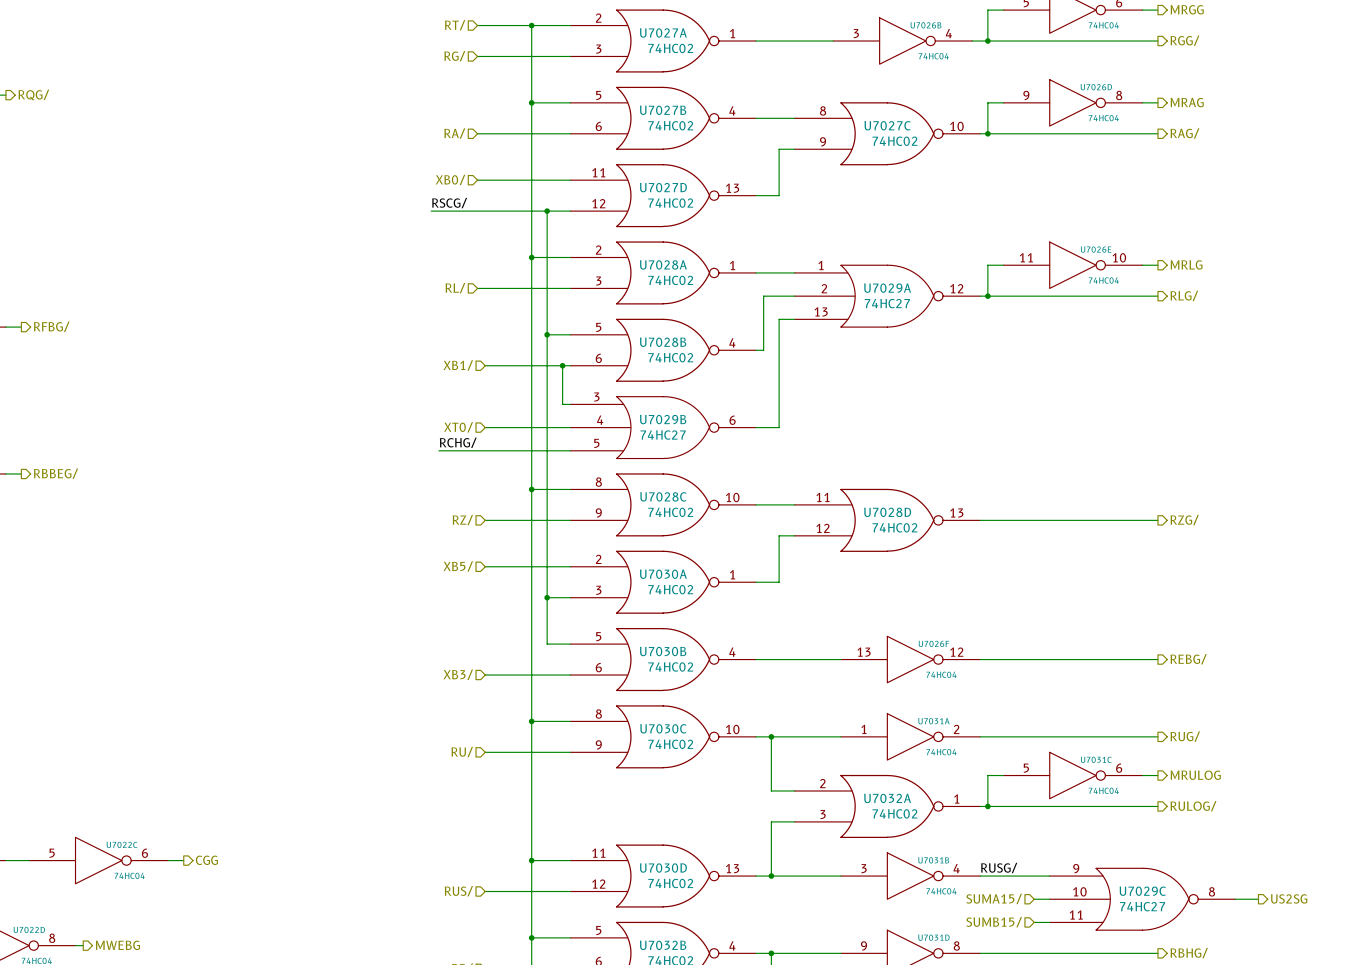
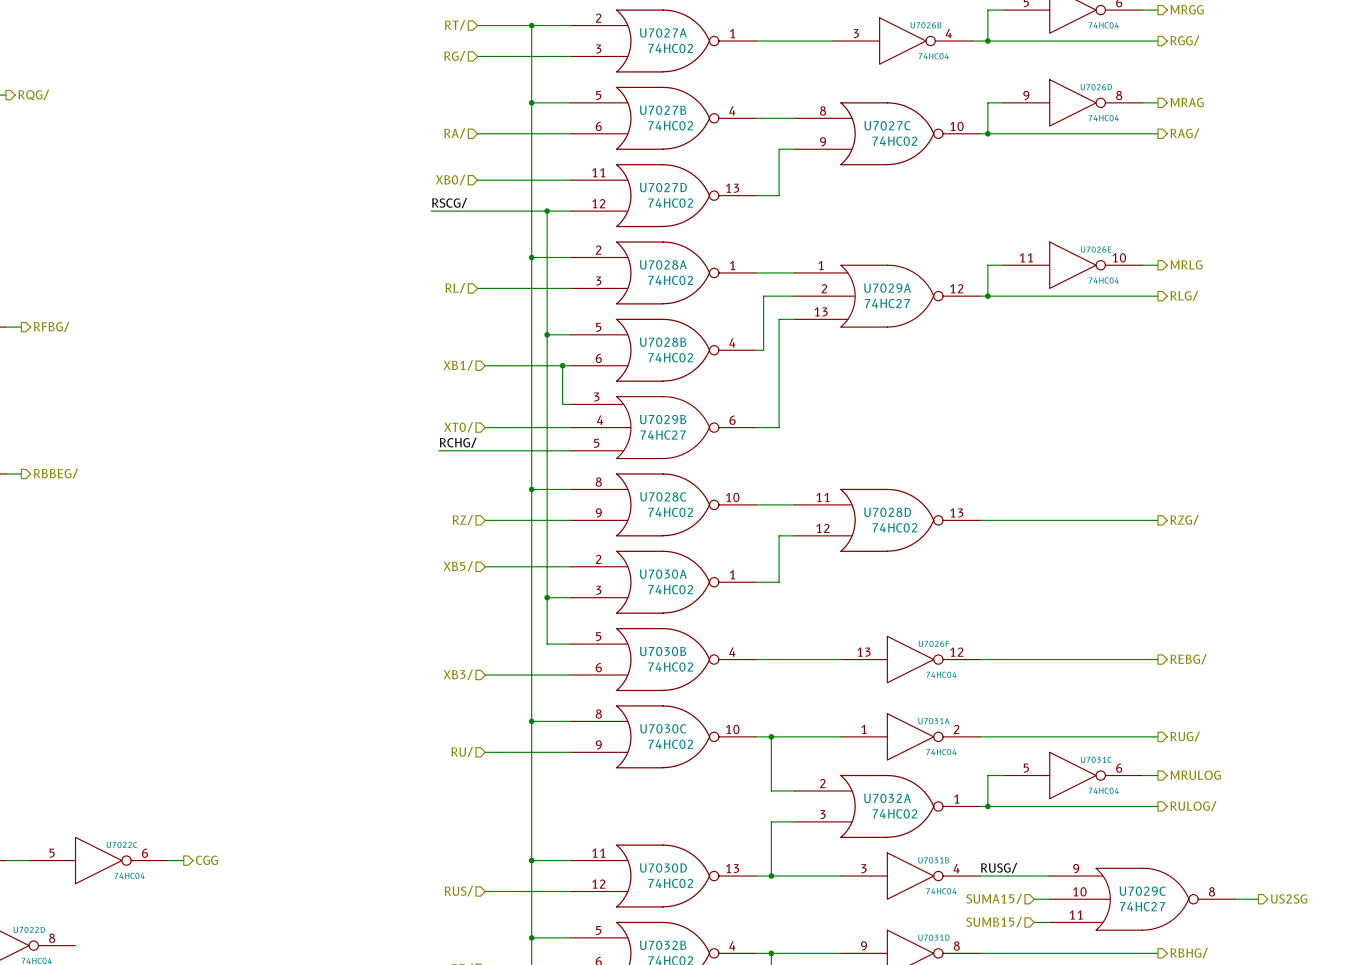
wire: (75, 945) (83, 945) -> none
hierarchical label: MWEBG (117, 945) -> none

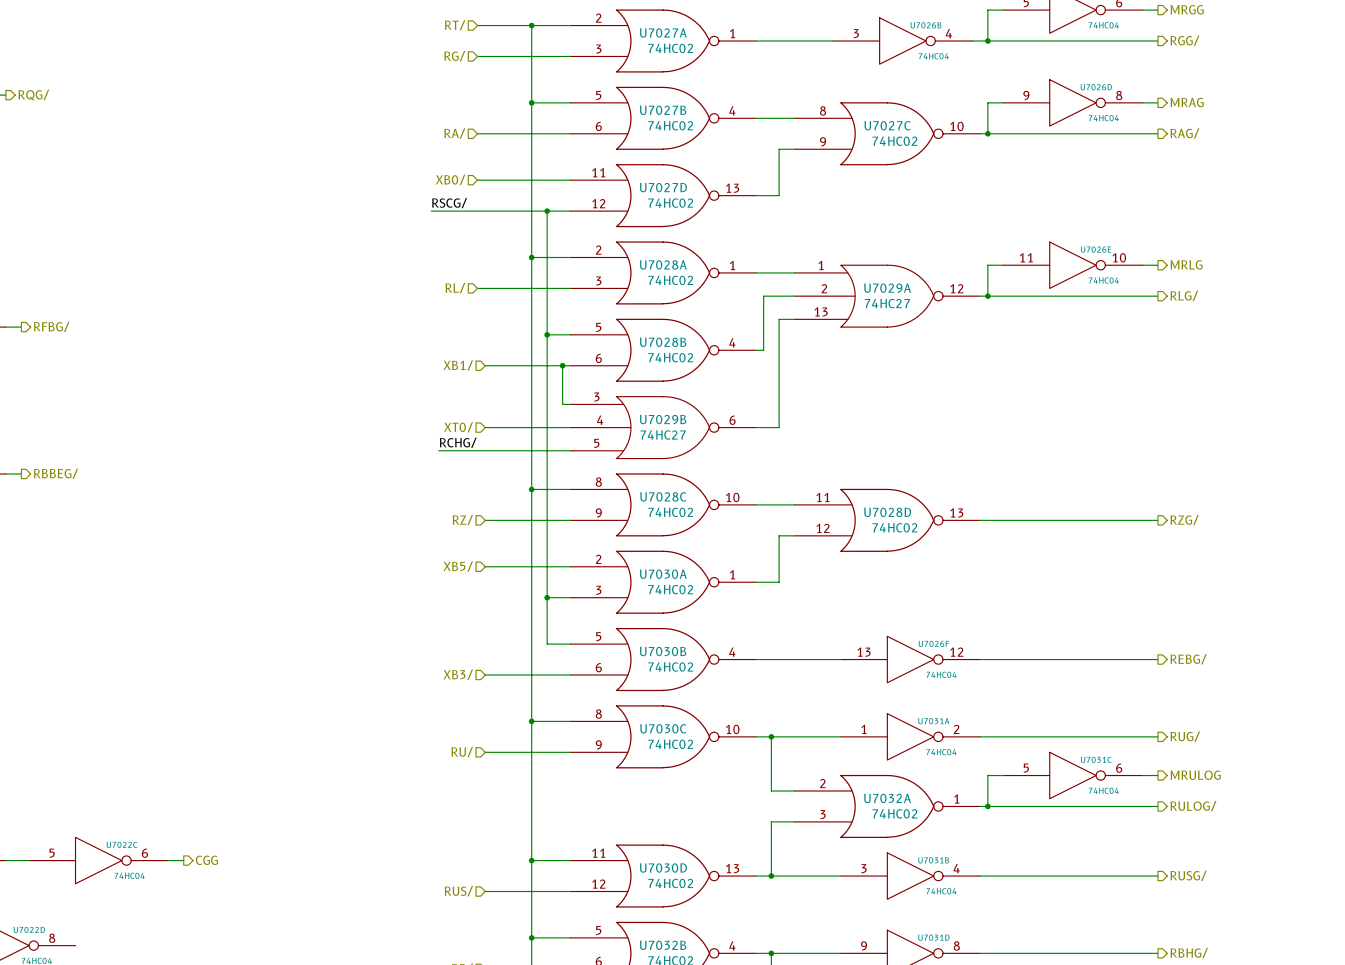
label: RUSG/ (999, 868) -> none
hierarchical label: none -> RUSG/ (1188, 875)
wire: none -> (1049, 876) (1157, 876)
hierarchical label: SUMA15/ (994, 898) -> none
hierarchical label: US2SG (1289, 898) -> none
wire: (1034, 899) (1049, 899) -> none
U7029C: 74HC27 (1142, 899) -> none
wire: (1235, 899) (1258, 899) -> none
hierarchical label: SUMB15/ (994, 922) -> none
wire: (1034, 922) (1049, 922) -> none

